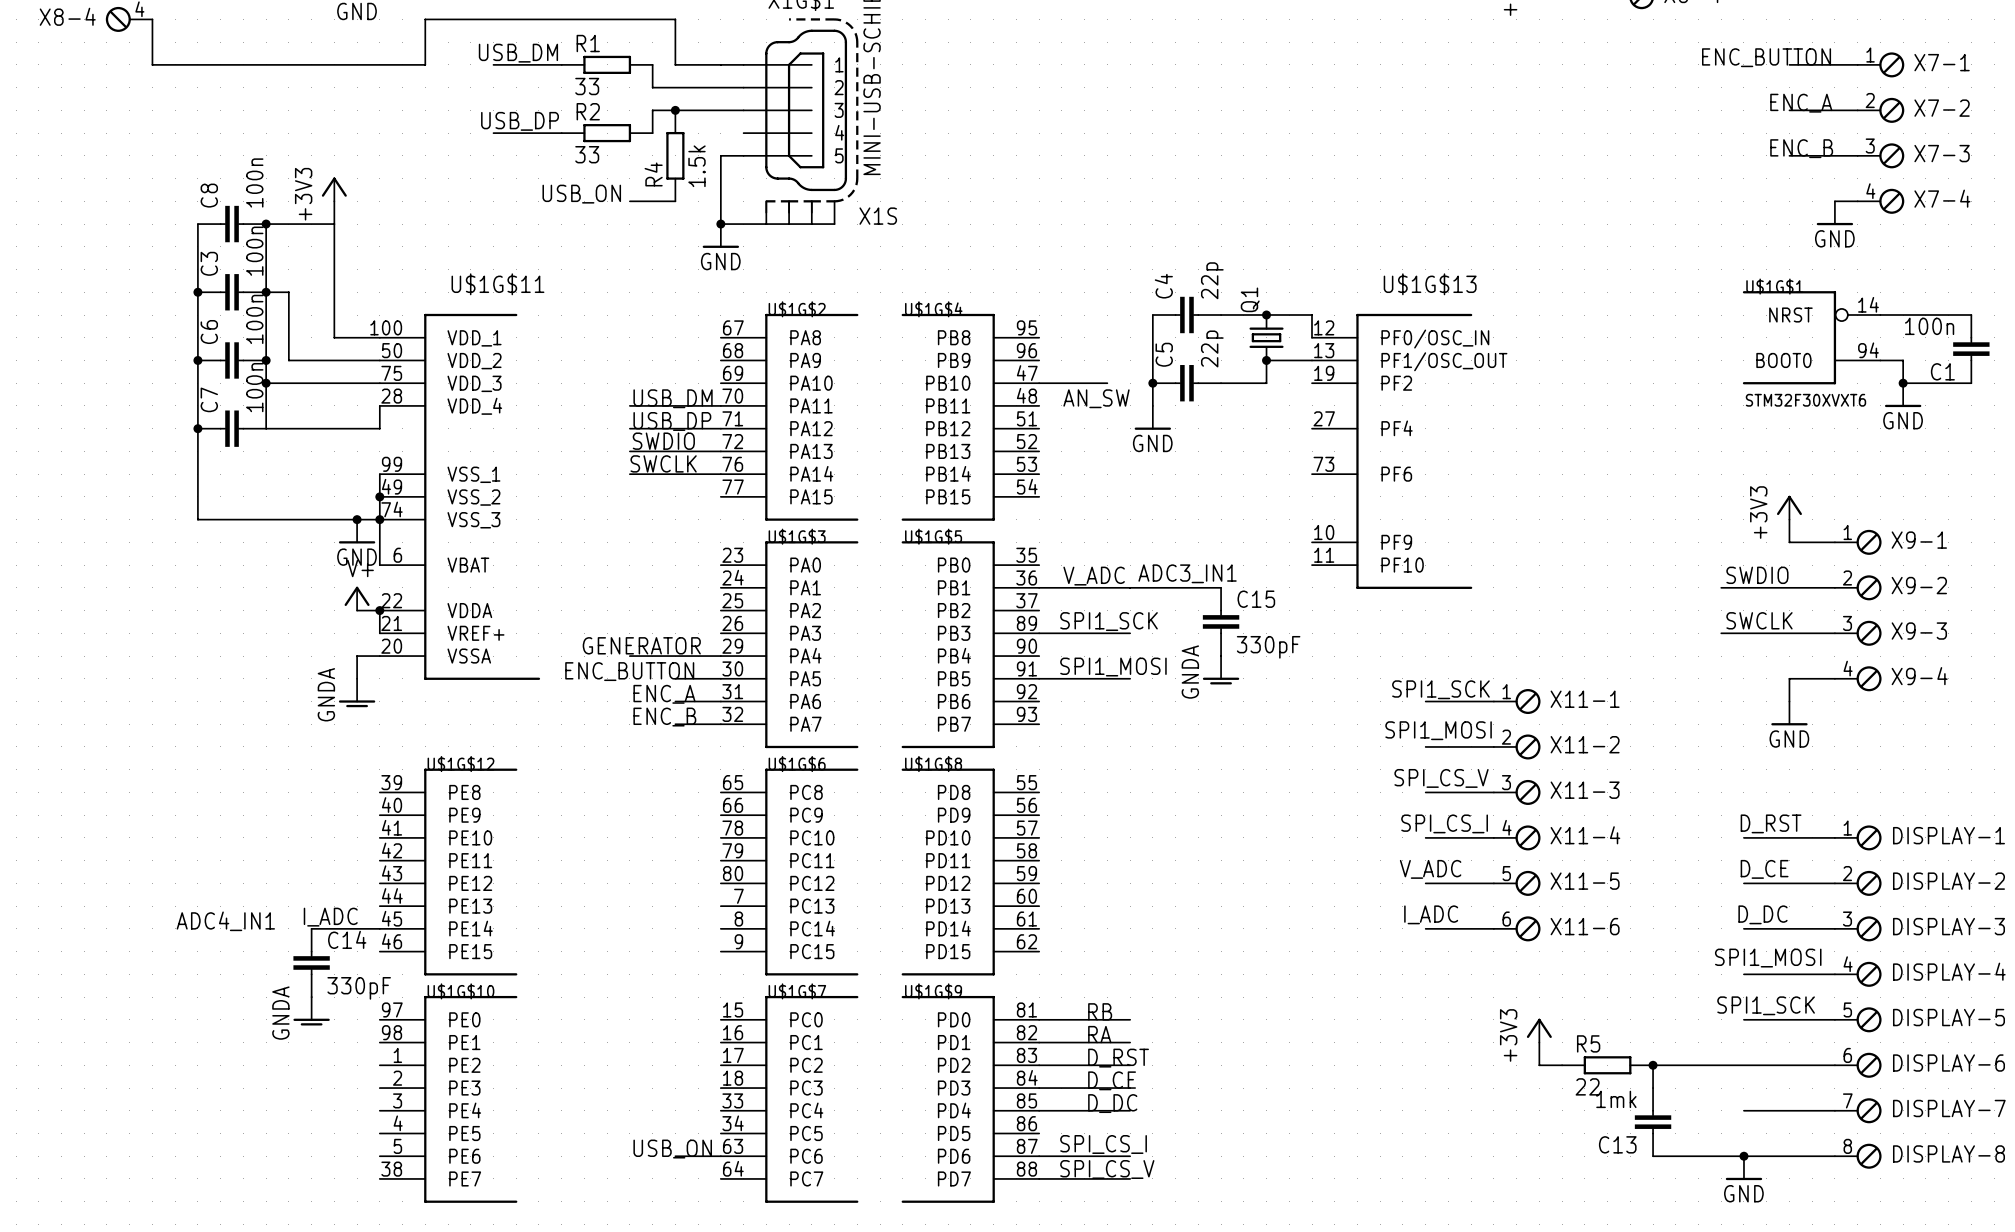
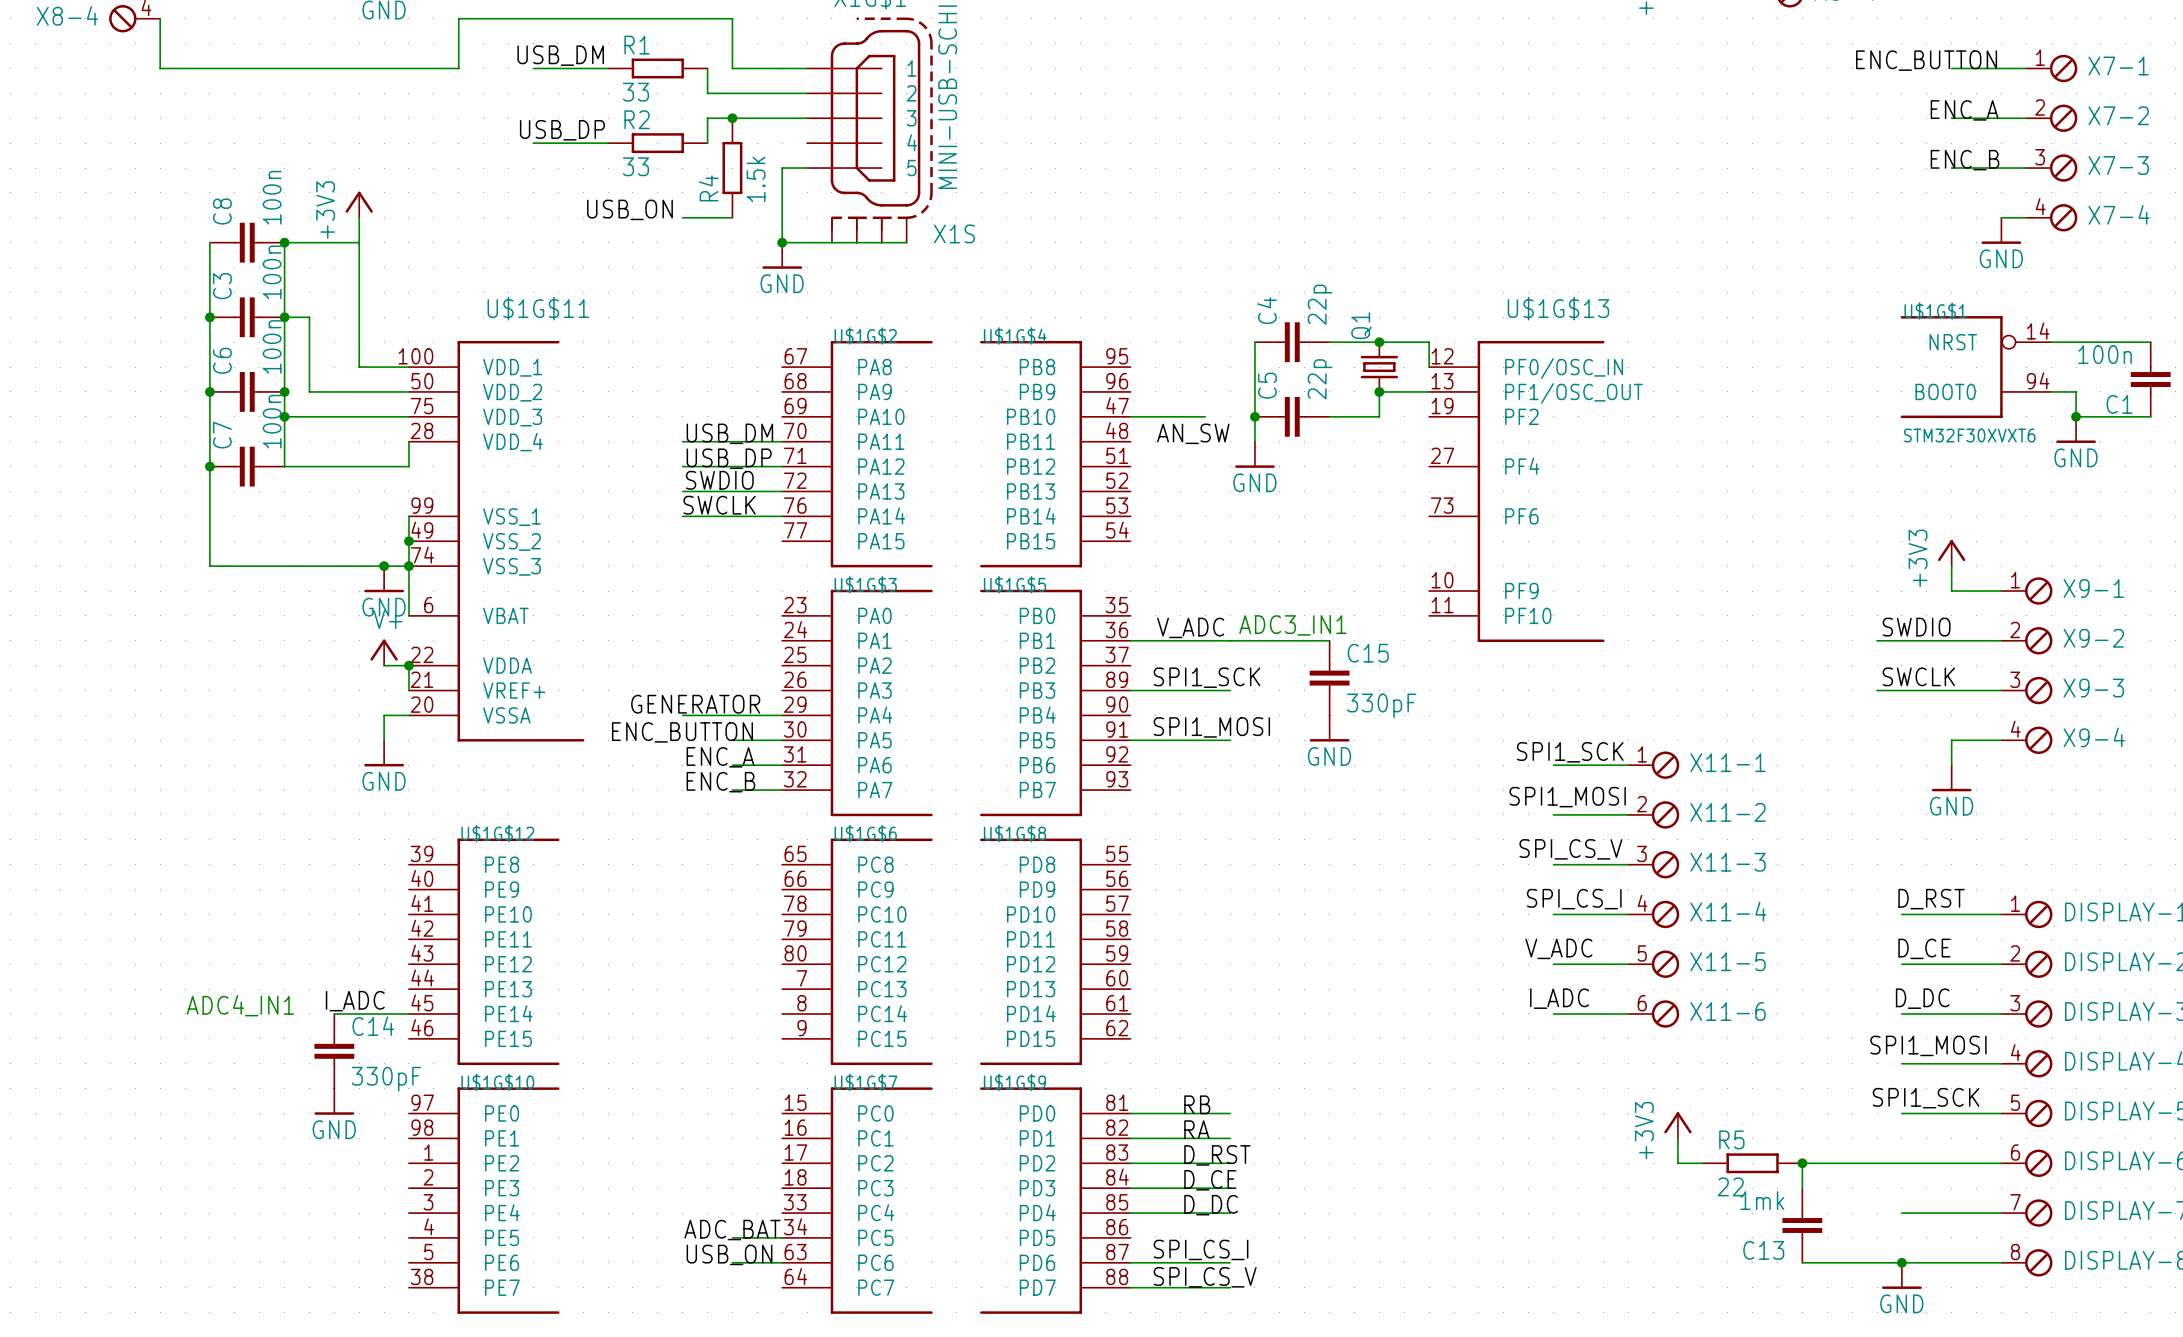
power symbol: GNDA (1221, 670) -> GND (1329, 728)
power symbol: GNDA (357, 692) -> GND (384, 753)
power symbol: GNDA (311, 1011) -> GND (334, 1101)
label: none -> ADC_BAT (732, 1230)
wire: none -> (732, 1237) (782, 1237)

